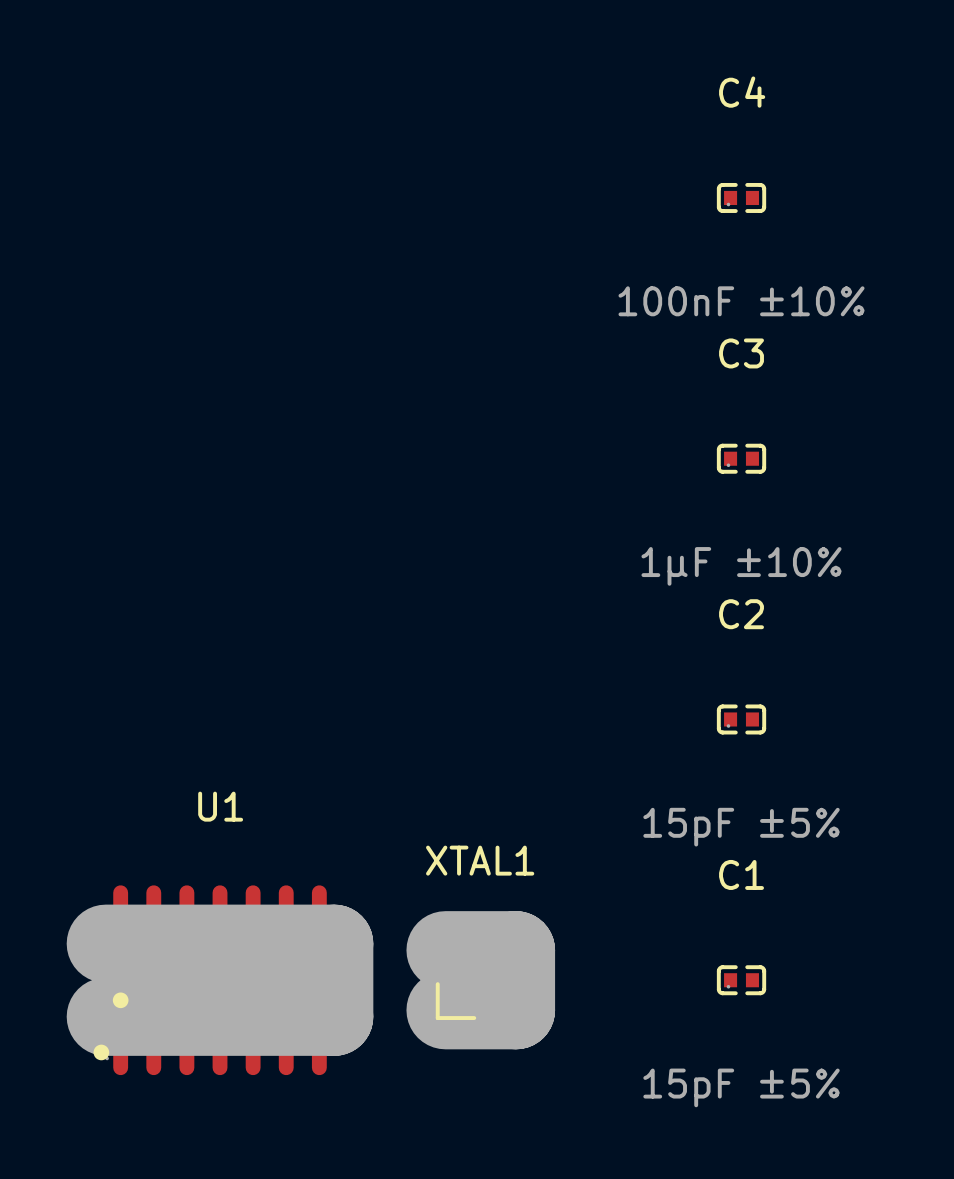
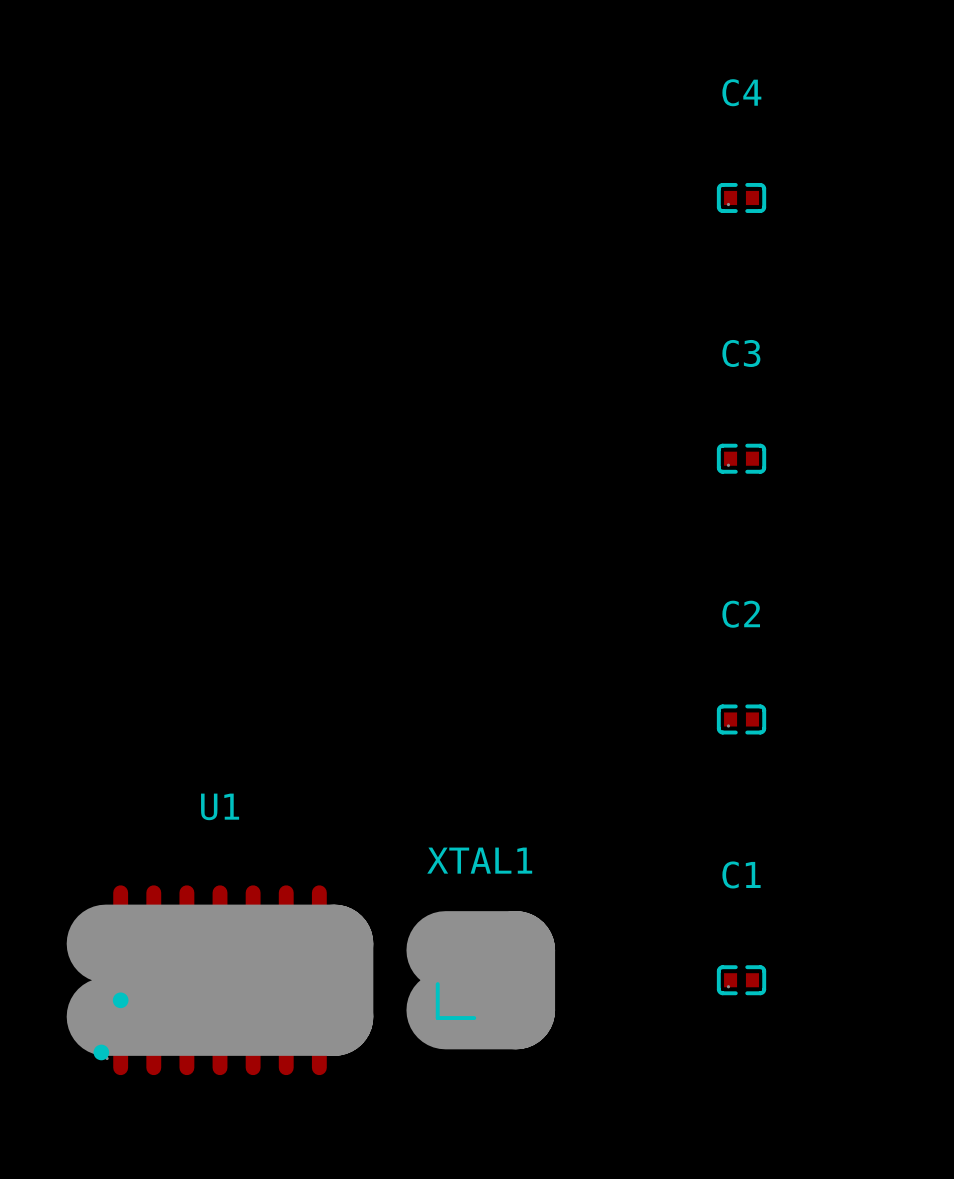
C4 value: 100nF ±10% (741, 301) -> none
C3 value: 1µF ±10% (741, 566) -> none
C2 value: 15pF ±5% (741, 827) -> none
C1 value: 15pF ±5% (741, 1087) -> none

